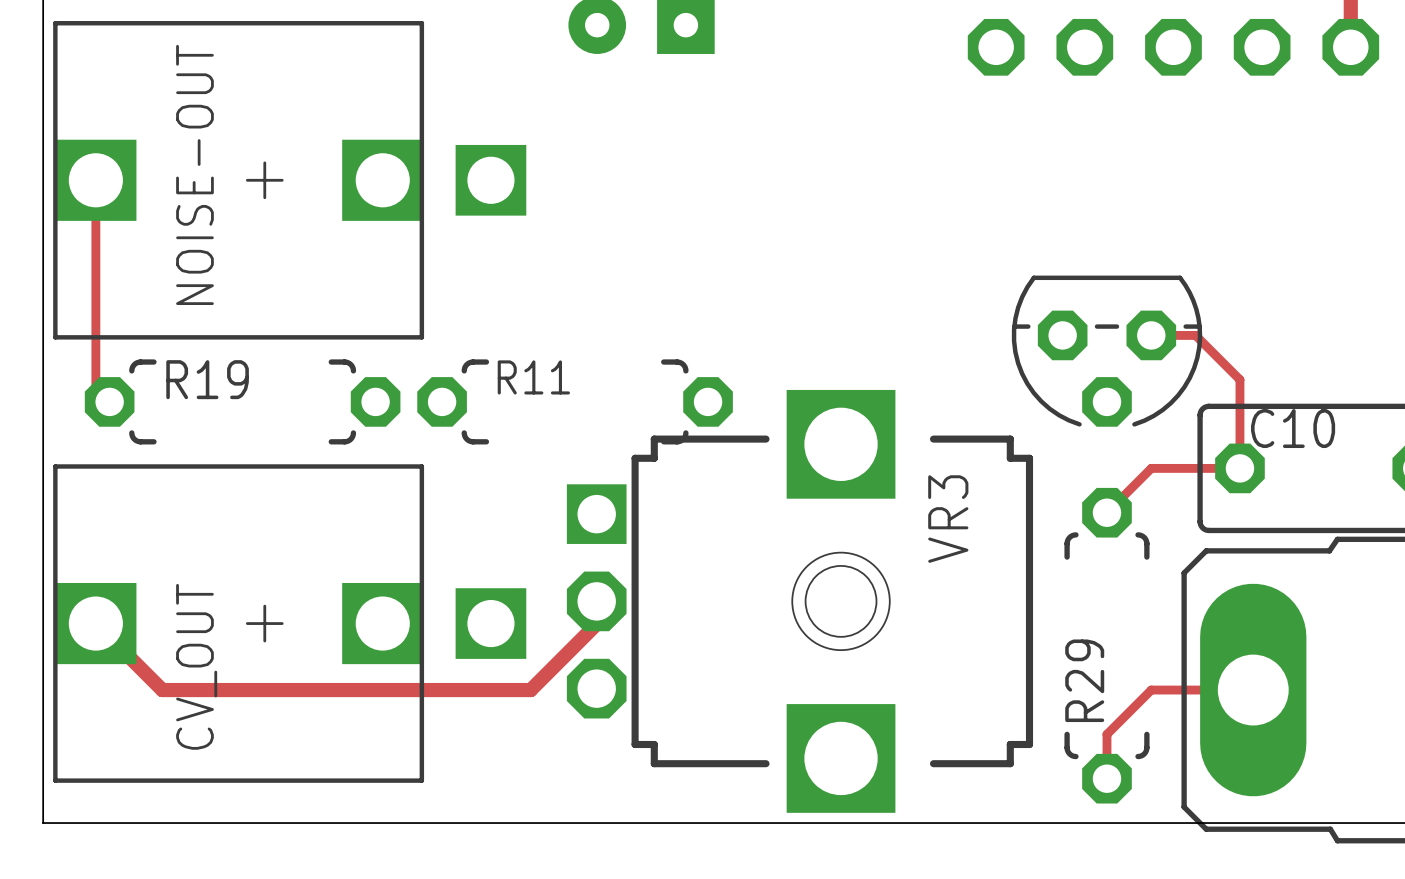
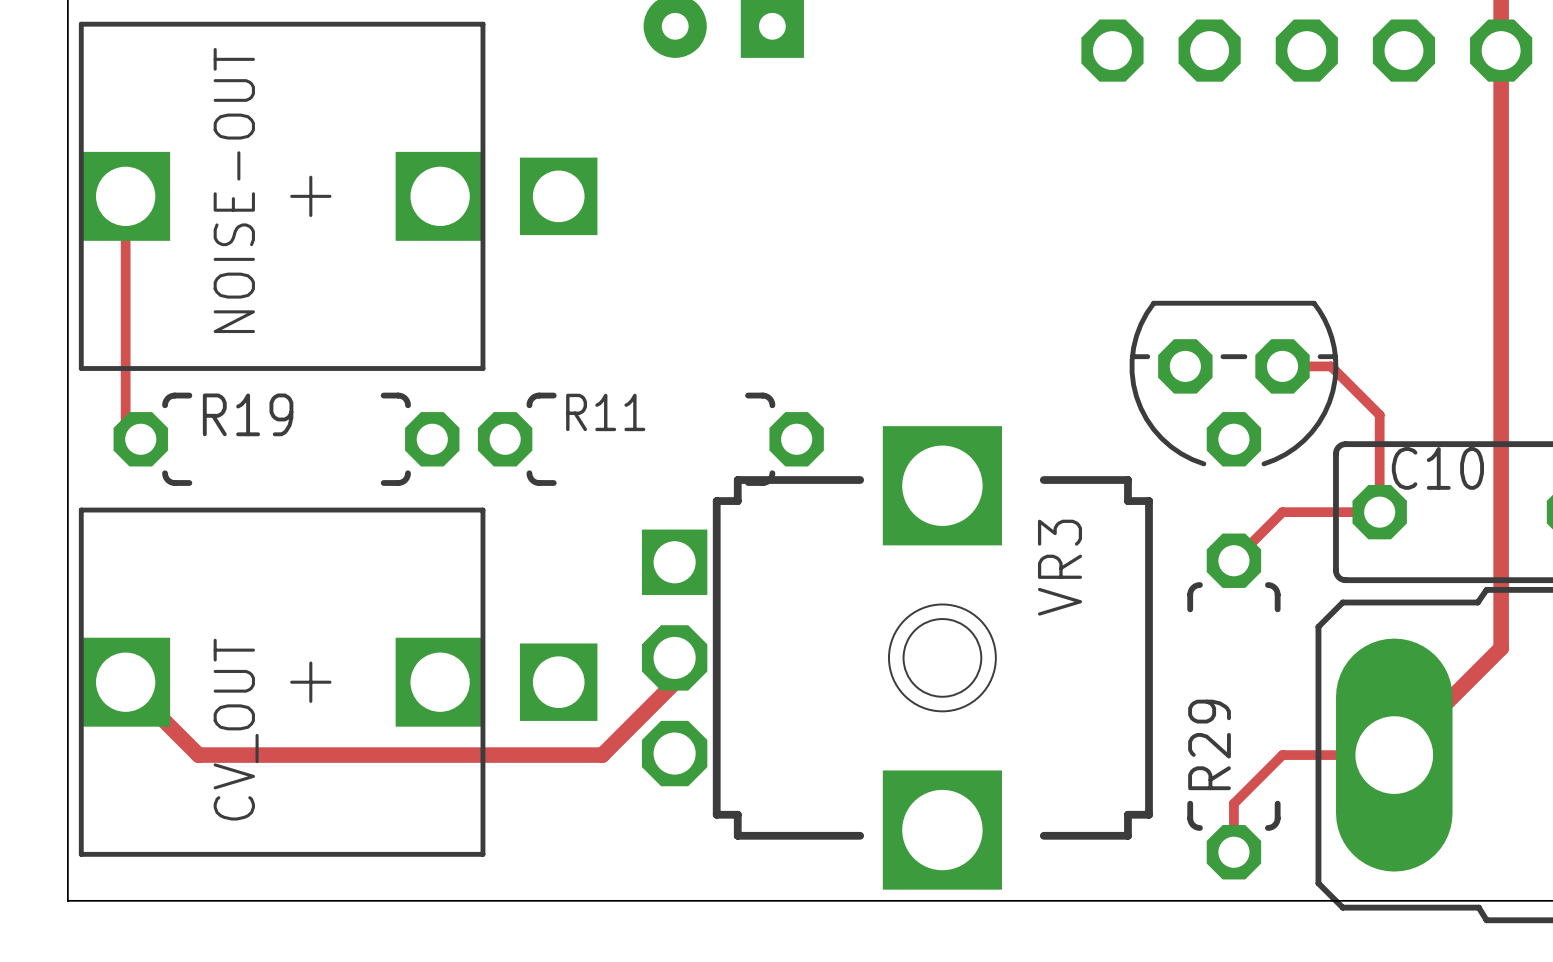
track: none -> (1501, 50) (1501, 648) (1394, 755)

